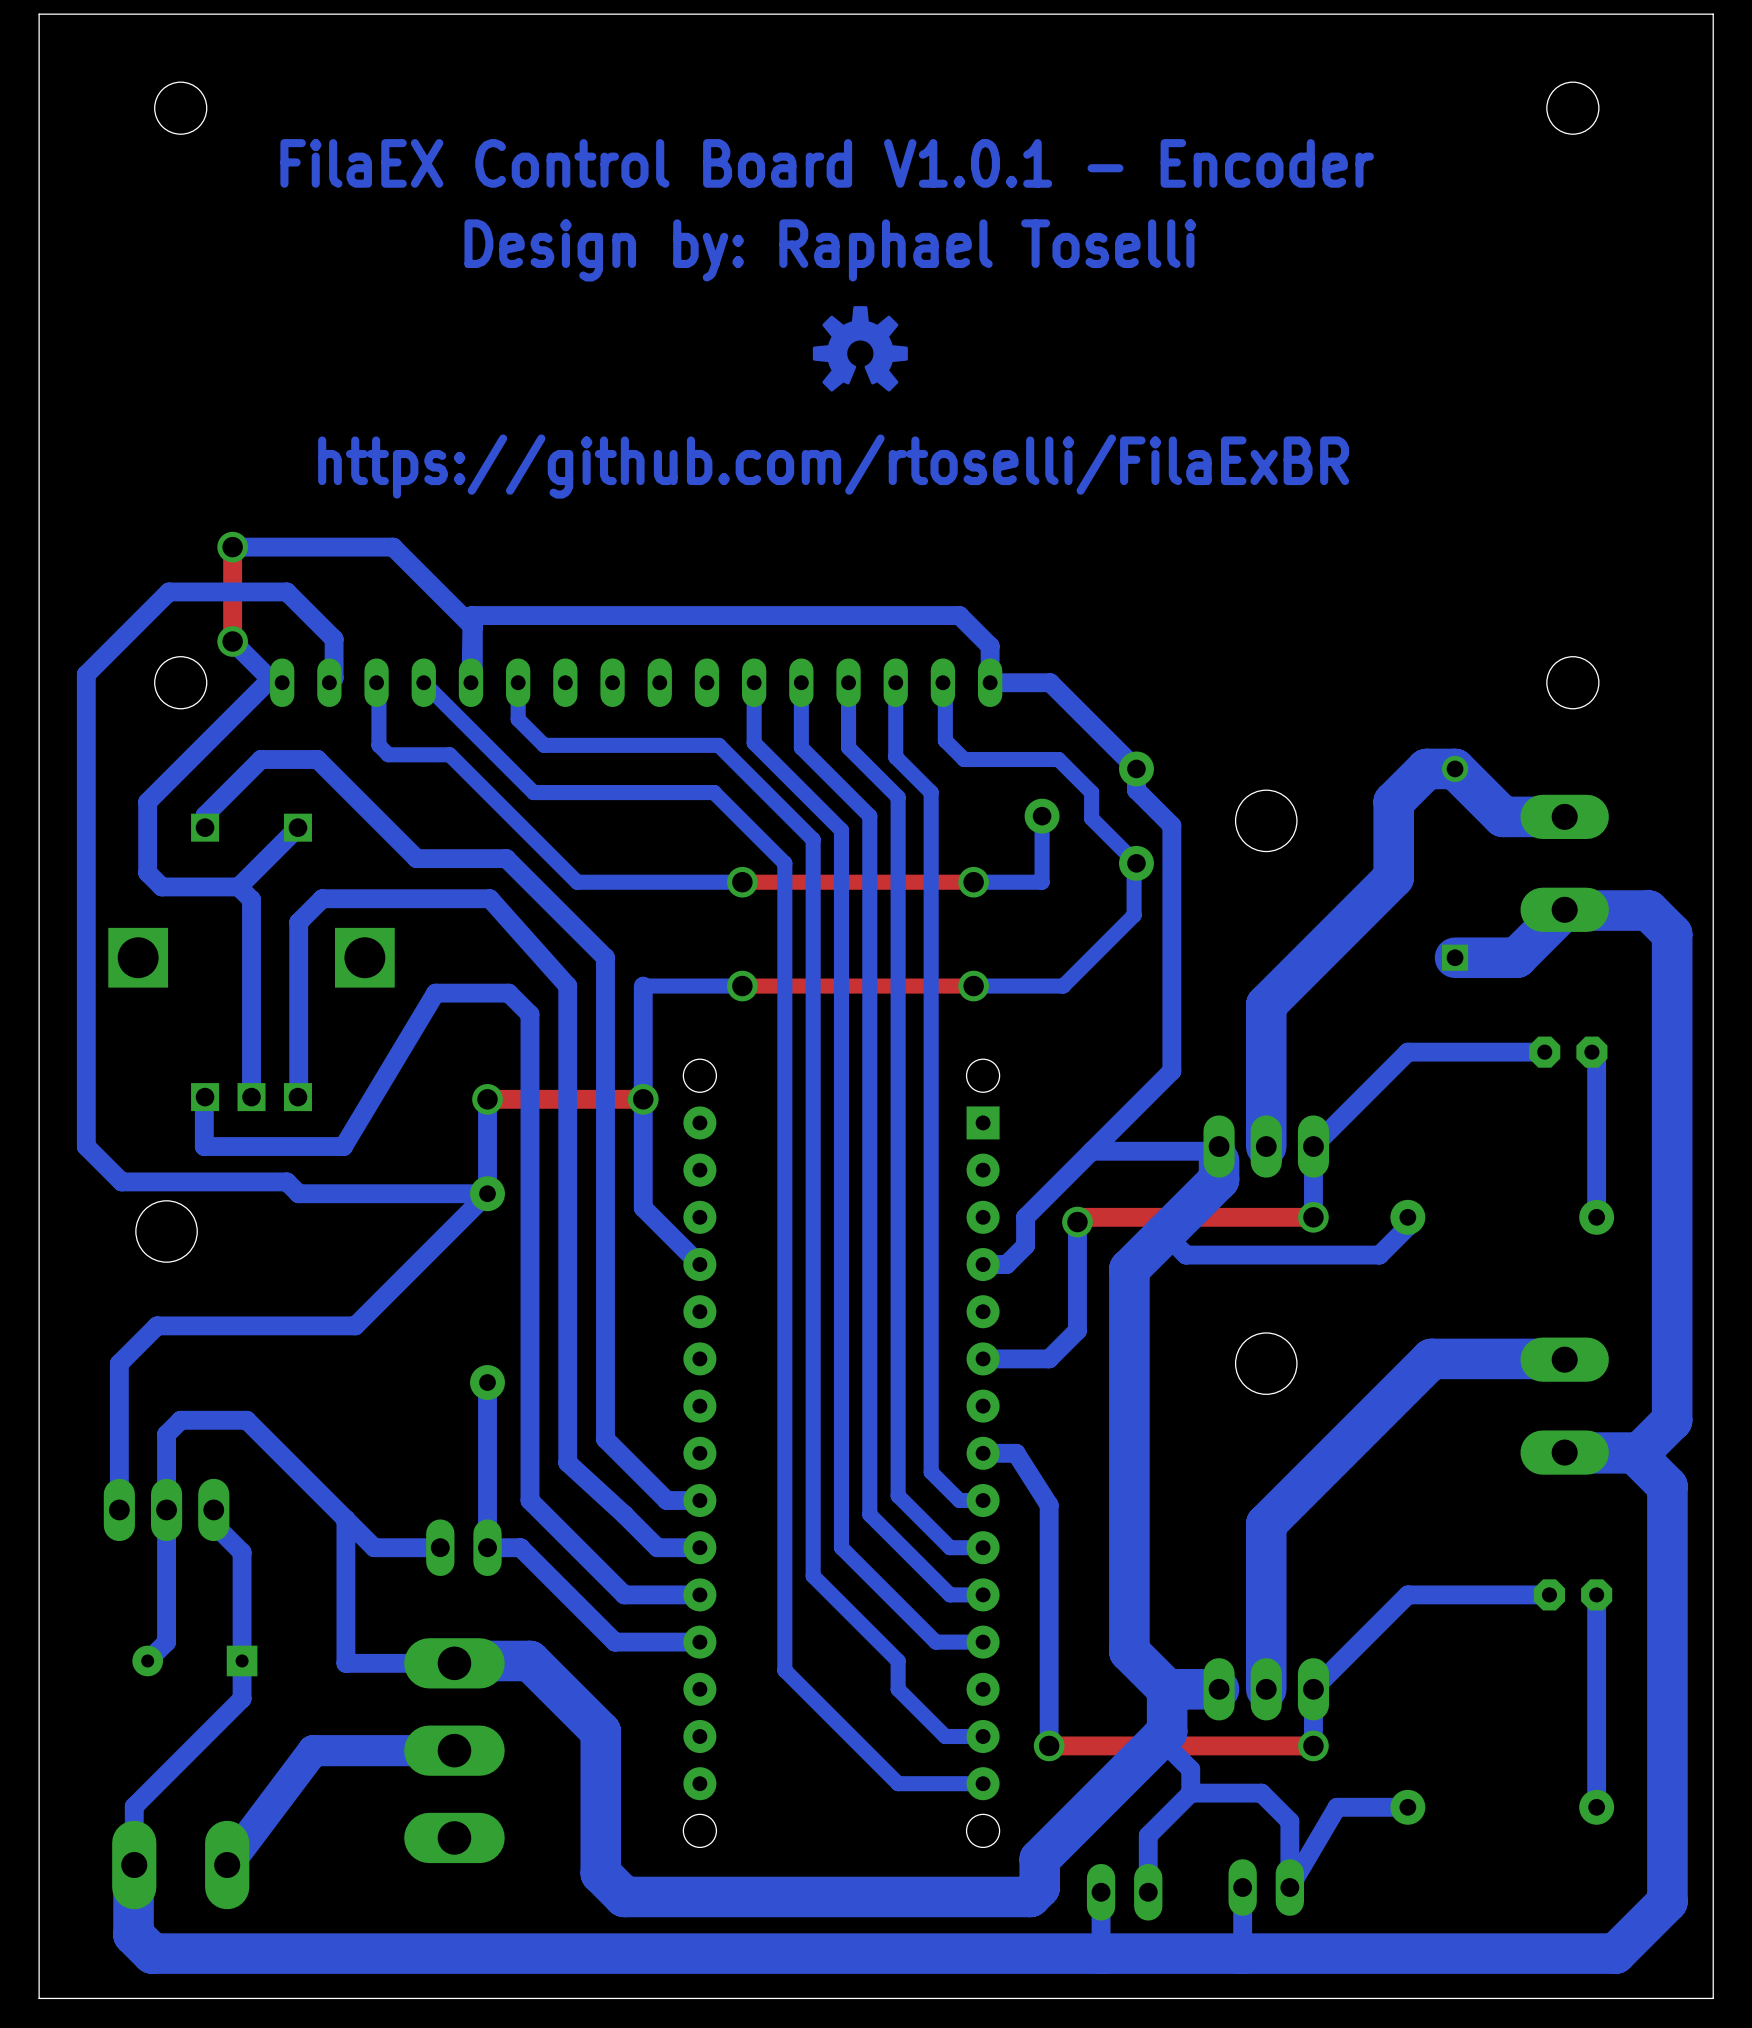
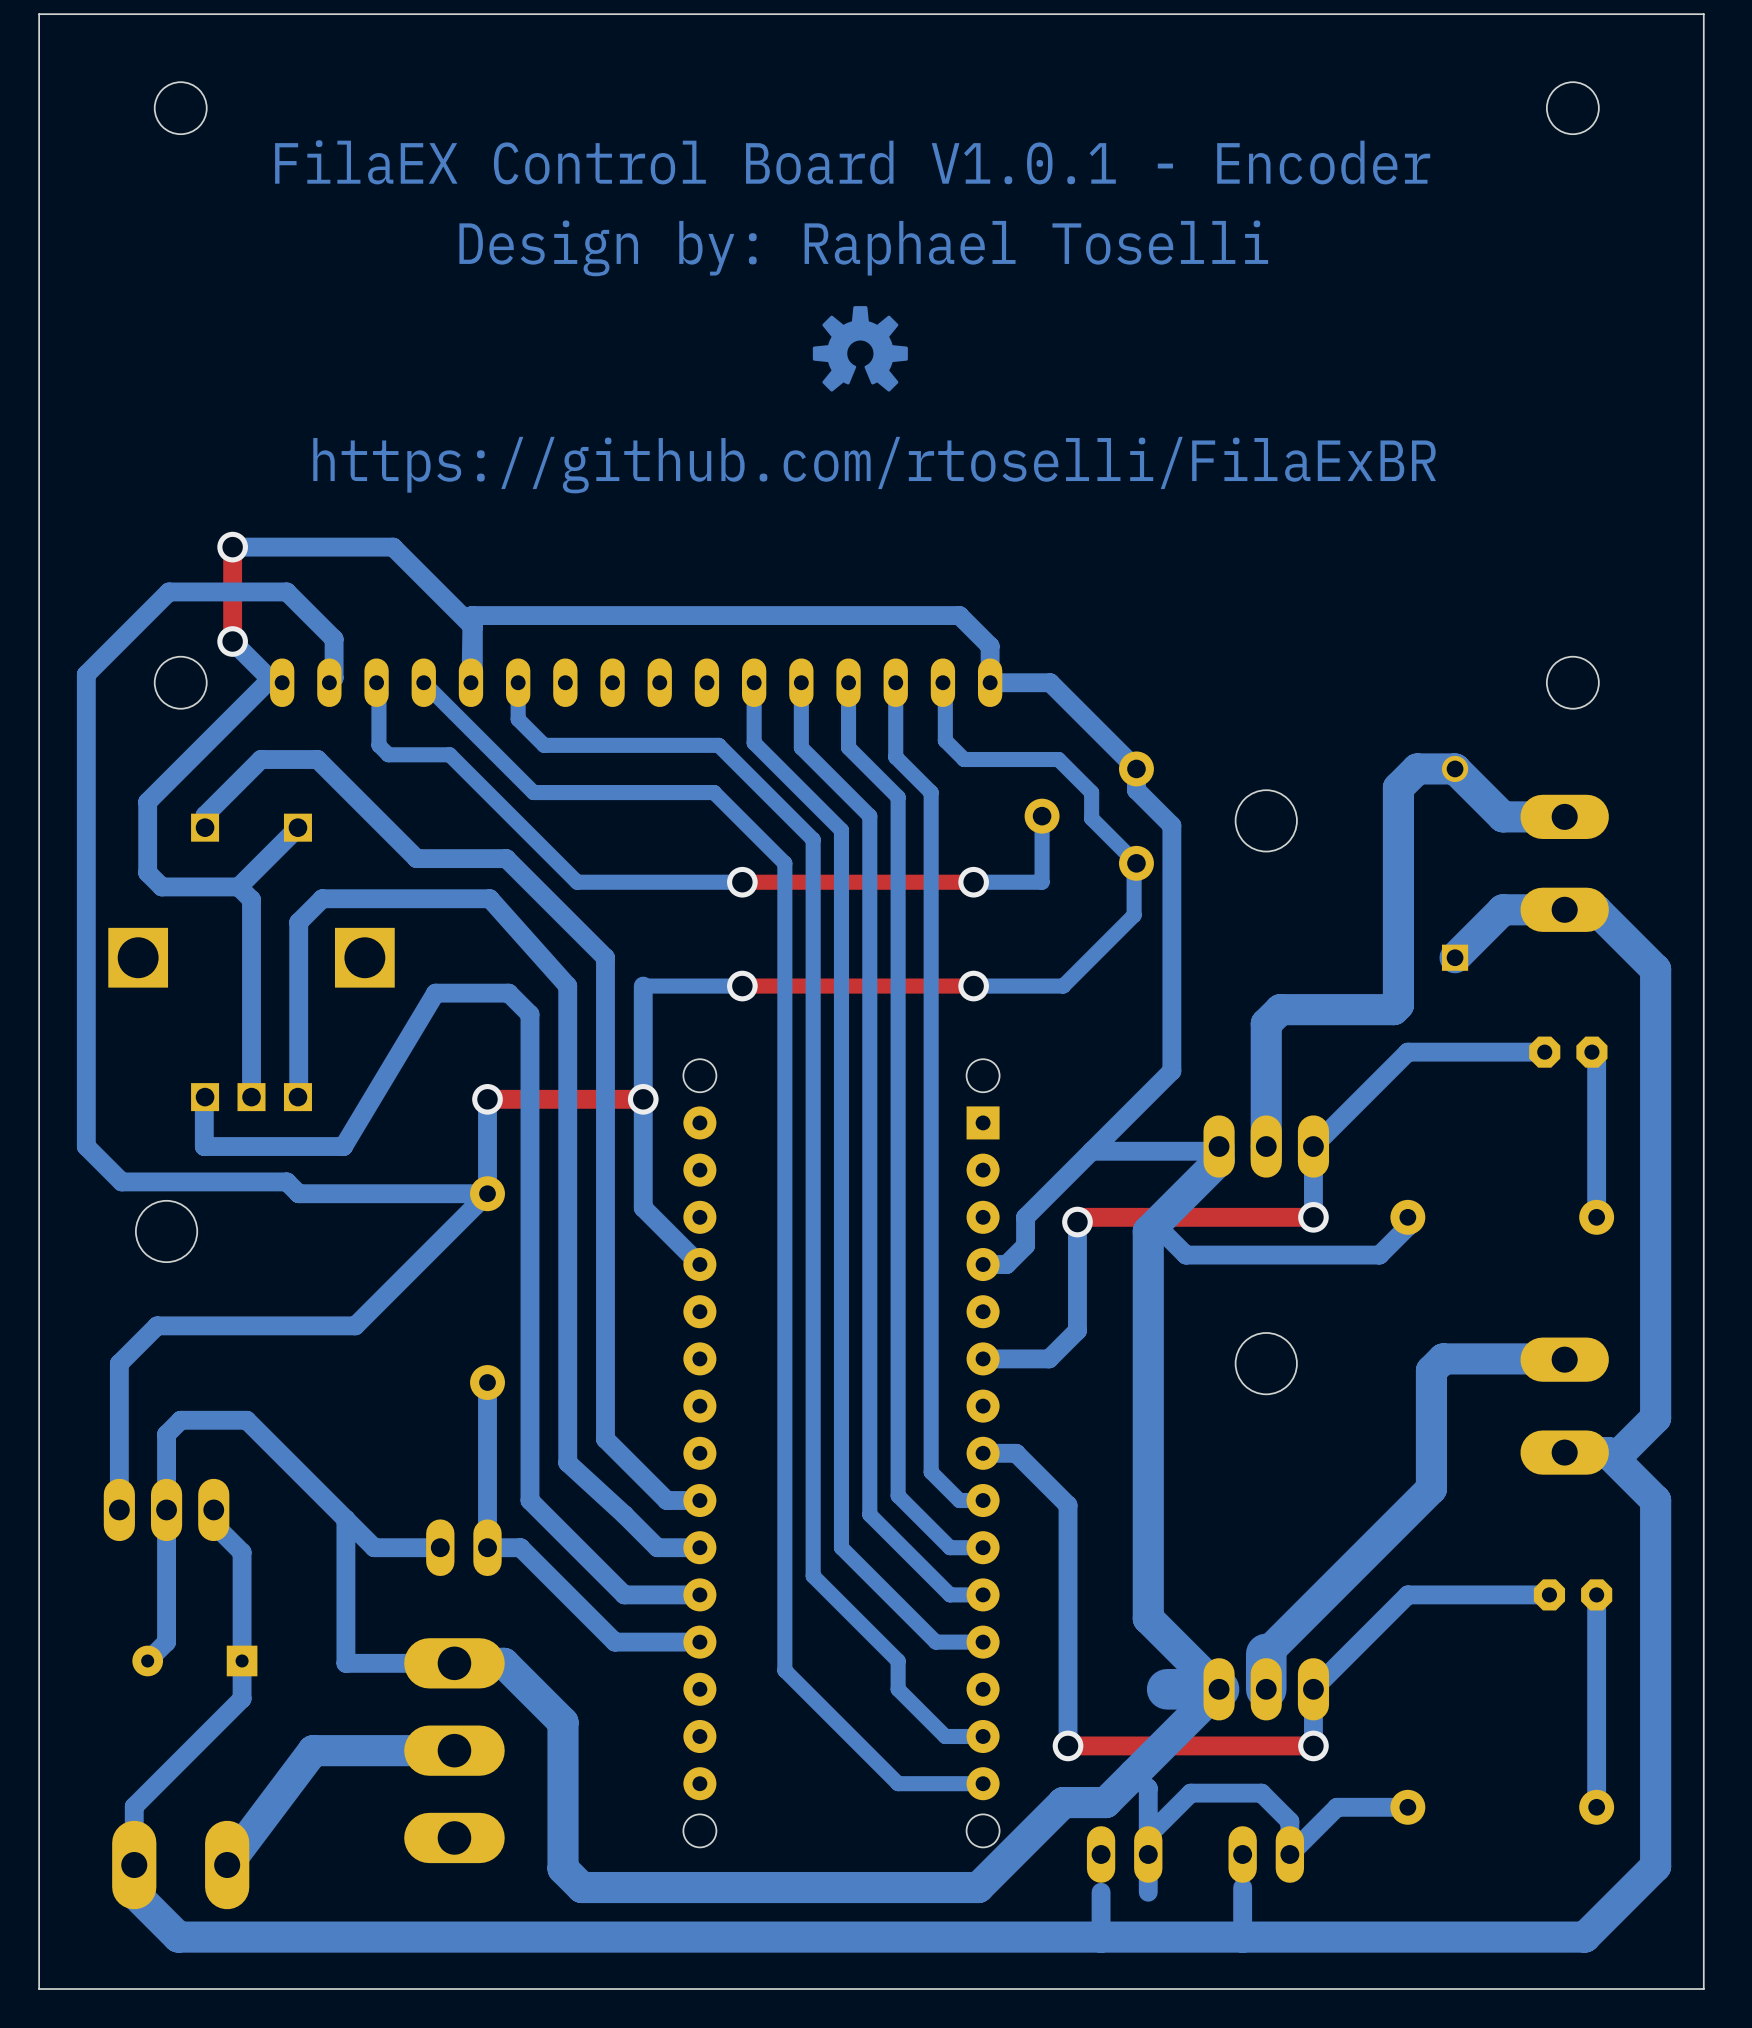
board edge: (1703, 14) (1713, 14) (1713, 1998) (39, 1998) (39, 1989) -> (1703, 14) (1703, 1989) (39, 1989)
bottom track: (1426, 768) (1393, 801) (1393, 877) (1266, 1004) (1266, 1023) -> (1426, 768) (1417, 768) (1398, 787) (1398, 1004) (1393, 1009) (1280, 1009) (1266, 1023)
bottom track width: thick (1426, 768) (1455, 768) (1502, 816) (1564, 816) -> thin (1426, 768) (1455, 768) (1502, 816) (1564, 816)
bottom track: none -> (1595, 909) (1655, 969) (1655, 1417) (1620, 1453)
bottom track: (1455, 957) (1516, 957) (1564, 909) (1648, 910) (1672, 934) (1672, 1420) (1639, 1452) (1607, 1452) -> (1455, 957) (1502, 909) (1564, 909)
bottom track width: thick (1266, 1023) (1266, 1146) -> thin (1266, 1023) (1266, 1146)
bottom track: (1219, 1160) (1219, 1179) (1129, 1269) (1129, 1651) (1167, 1689) (1167, 1731) (1039, 1859) (1039, 1887) (1030, 1896) (624, 1896) (600, 1873) (600, 1731) (529, 1660) (447, 1660) (445, 1663) -> (1219, 1160) (1148, 1231) (1148, 1618) (1219, 1689) (1105, 1802) (1063, 1802) (978, 1887) (581, 1887) (563, 1868) (563, 1722) (504, 1663) (454, 1663)
bottom track: (1443, 1358) (1431, 1358) (1266, 1524) (1266, 1653) -> (1443, 1358) (1431, 1370) (1431, 1488) (1266, 1653)
bottom track width: thick (1563, 1358) (1443, 1358) -> thin (1563, 1358) (1443, 1358)
bottom track: (1016, 1453) (1049, 1505) (1049, 1745) -> (1016, 1453) (1068, 1505) (1068, 1745)
bottom track: (1620, 1453) (1634, 1453) (1667, 1486) (1667, 1901) (1615, 1953) (152, 1953) (133, 1934) (133, 1892) -> (1607, 1452) (1655, 1500) (1655, 1866) (1584, 1937) (178, 1937) (133, 1892)
bottom track: (1160, 1738) (1190, 1769) (1190, 1793) -> none
via position: (1049, 1745) -> (1068, 1745)
bottom track: none -> (1134, 1774) (1148, 1788) (1148, 1835)
bottom track: (1337, 1807) (1289, 1887) (1289, 1854) -> (1337, 1807) (1289, 1854)
part position: (1266, 1887) -> (1266, 1854)
part position: (1124, 1892) -> (1124, 1854)

